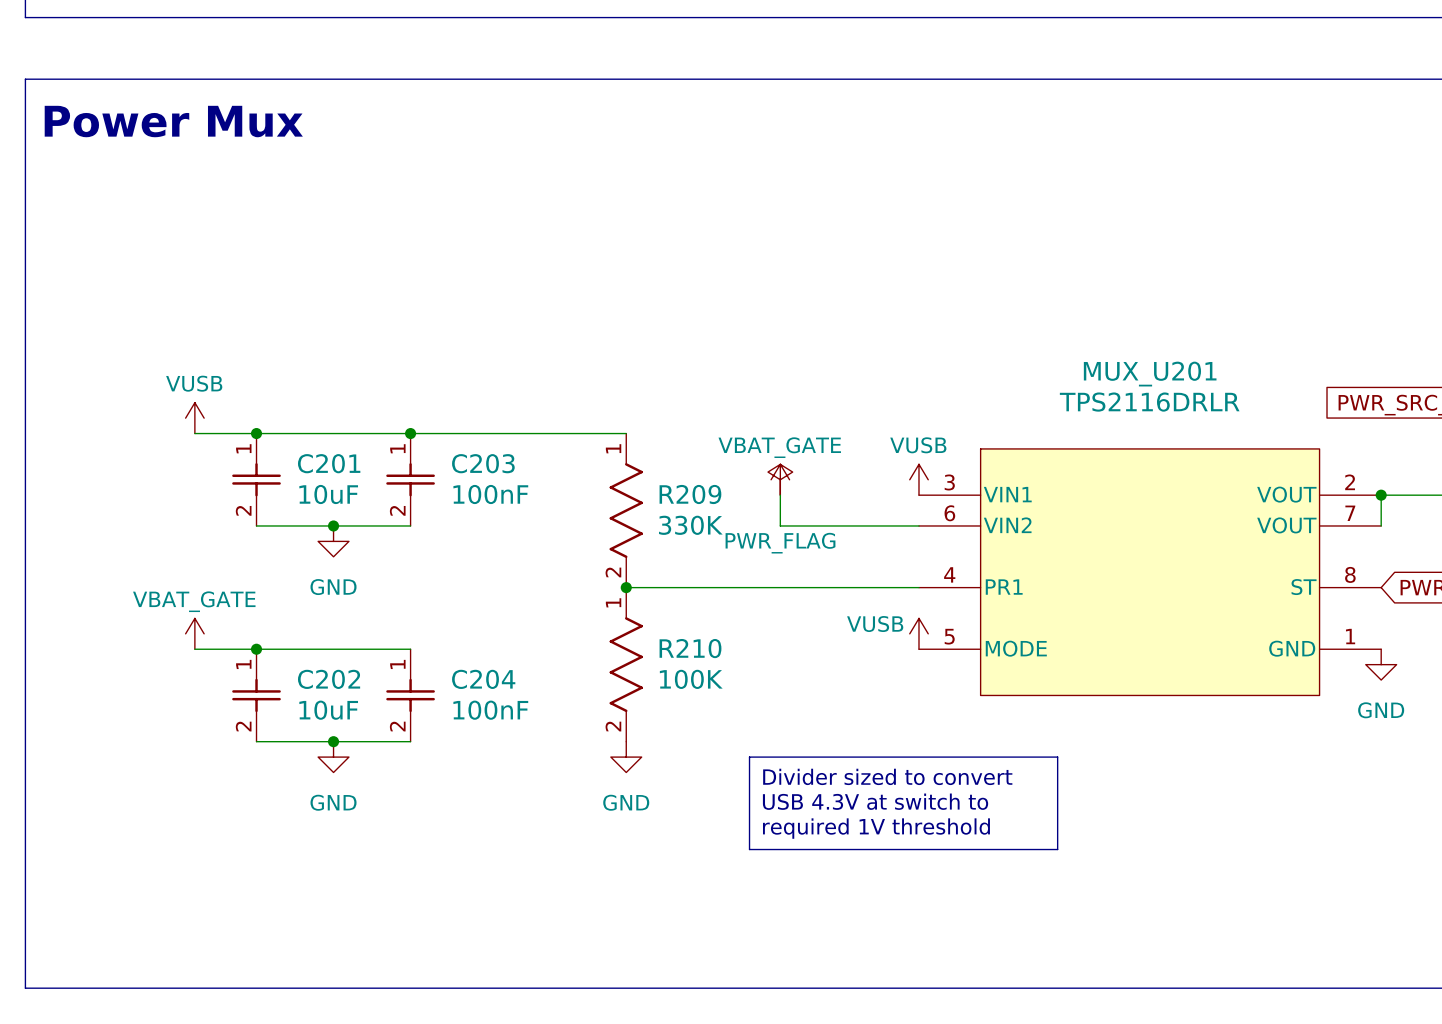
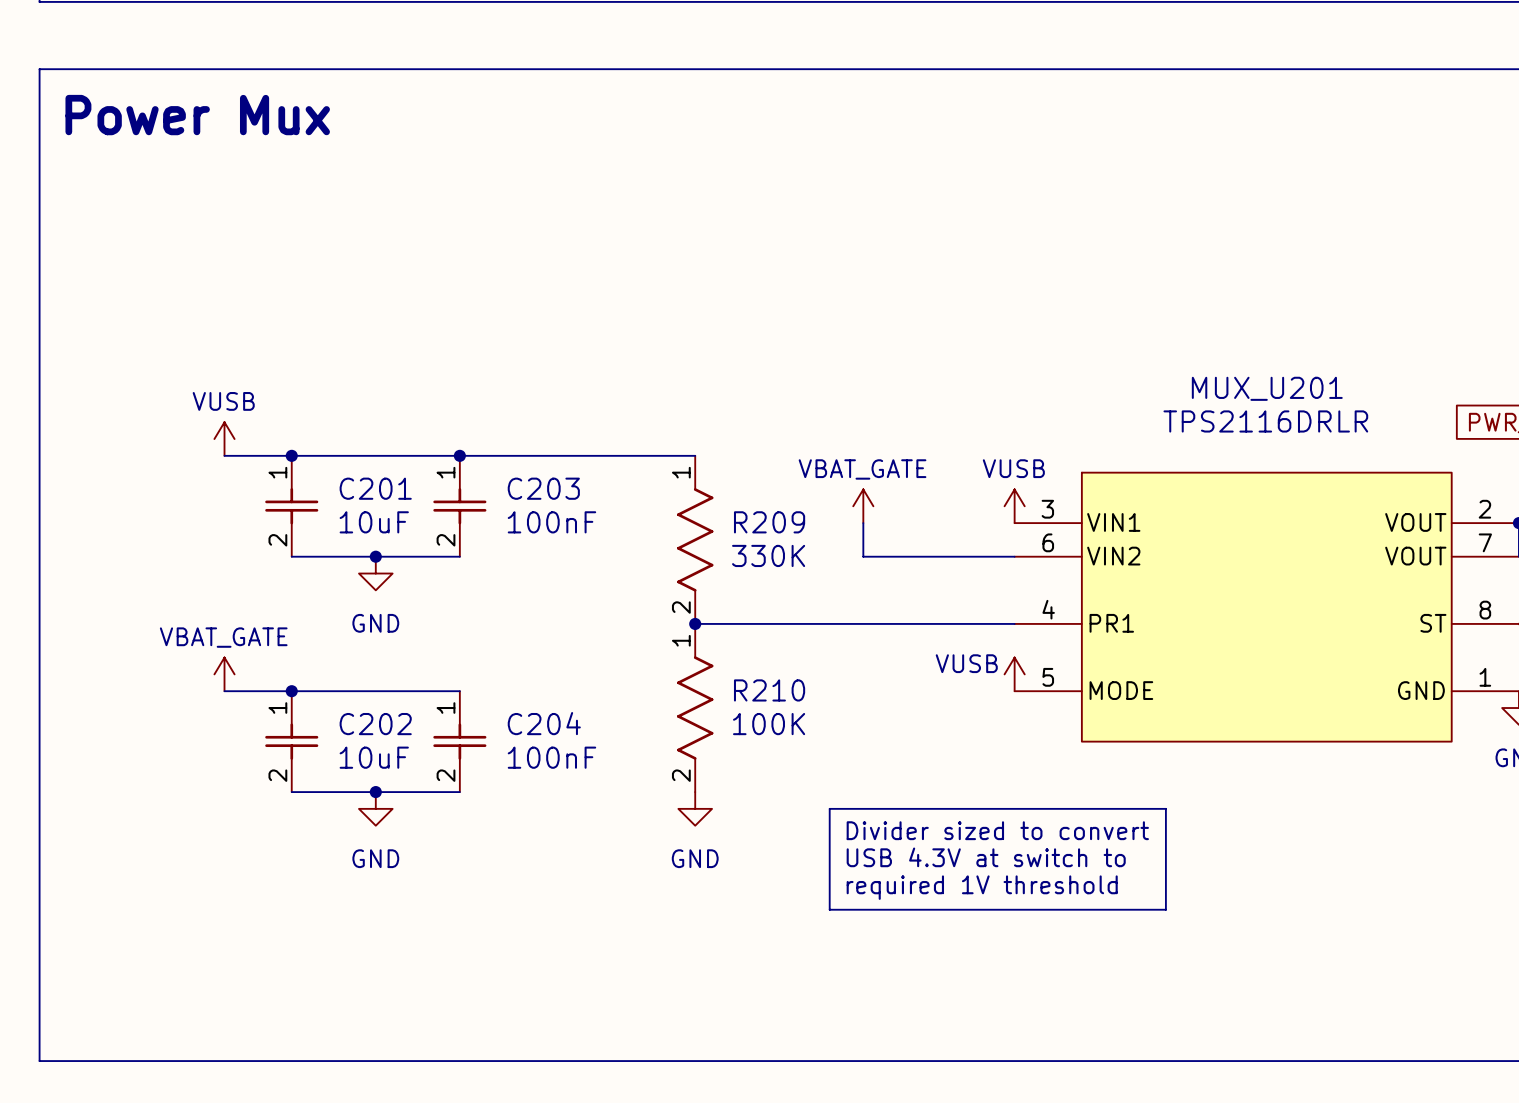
power symbol: PWR_FLAG (780, 479) -> none

